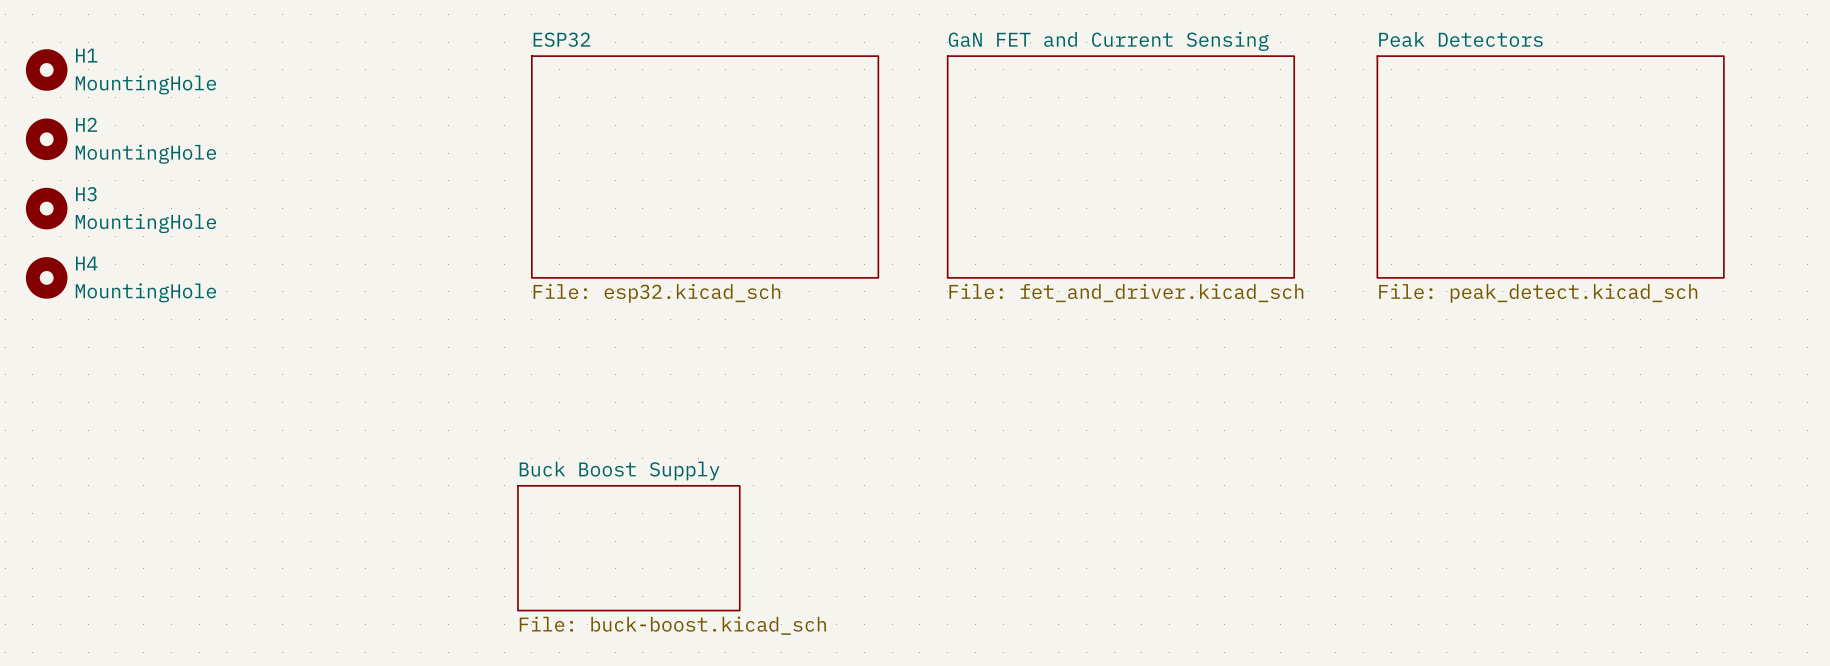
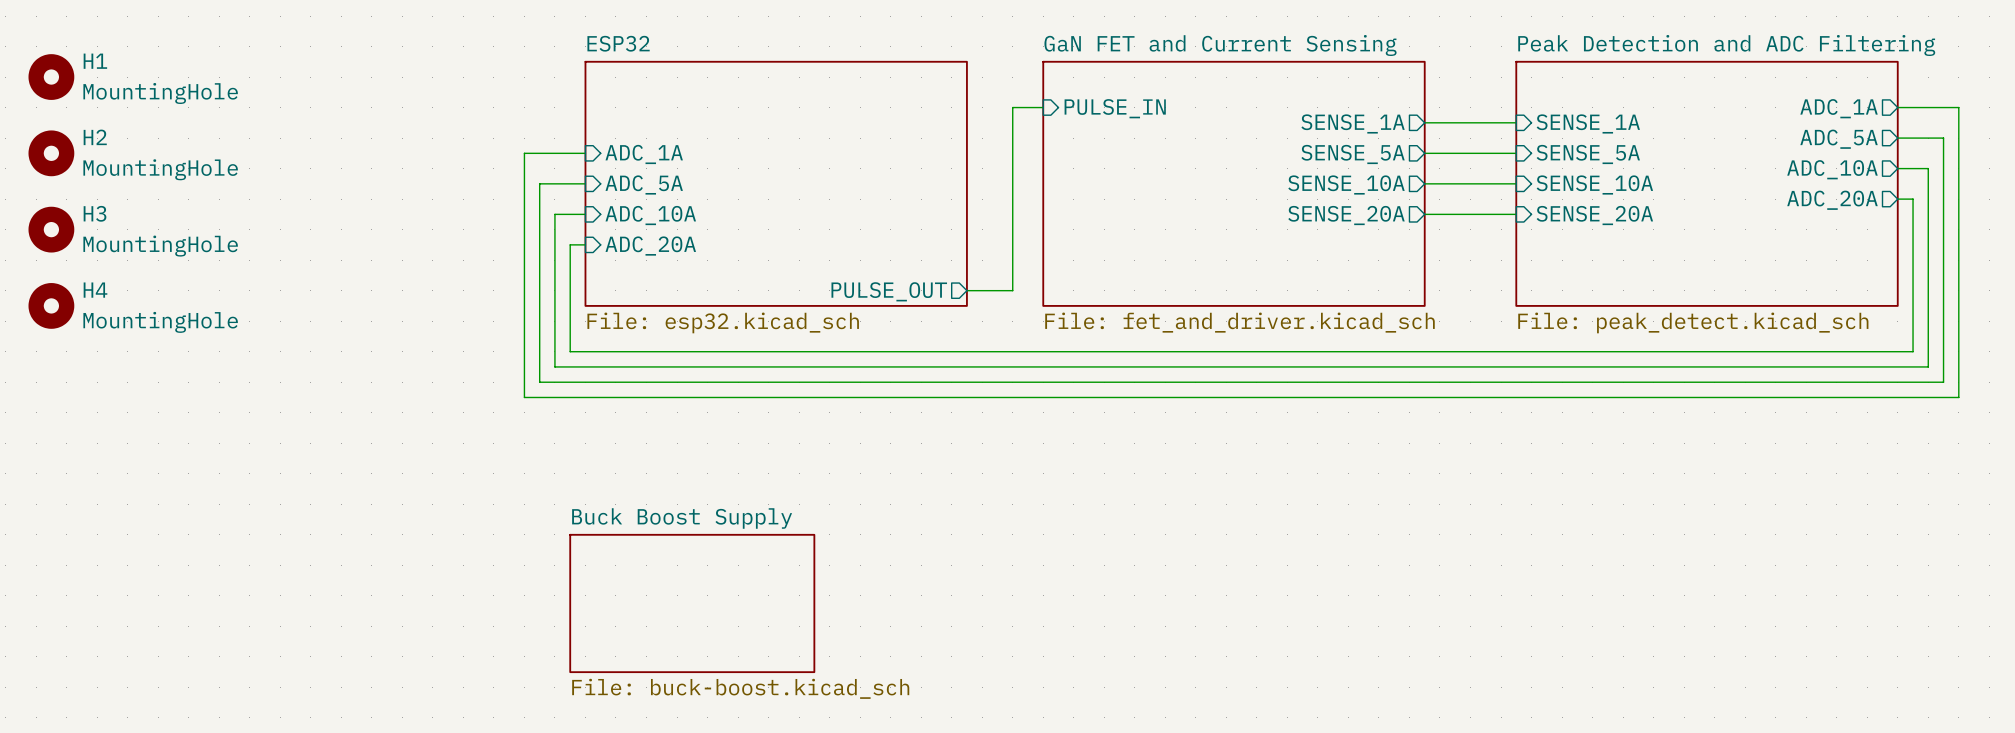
sheet Peak Detectors name: Peak Detectors (1460, 39) -> Peak Detection and ADC Filtering (1726, 45)
wire: none -> (1043, 107) (1012, 107) (1012, 290) (966, 290)
wire: none -> (1897, 107) (1958, 107) (1958, 397) (524, 397) (524, 153) (585, 153)
sheet pin: none -> PULSE_IN (1115, 108)
sheet pin: none -> ADC_1A (1839, 108)
wire: none -> (1424, 122) (1516, 122)
sheet pin: none -> SENSE_1A (1353, 123)
sheet pin: none -> SENSE_1A (1588, 123)
wire: none -> (1897, 138) (1943, 138) (1943, 382) (539, 382) (539, 183) (585, 183)
sheet pin: none -> ADC_5A (1839, 139)
wire: none -> (1424, 153) (1516, 153)
sheet pin: none -> ADC_1A (644, 154)
sheet pin: none -> SENSE_5A (1353, 154)
sheet pin: none -> SENSE_5A (1588, 154)
wire: none -> (1897, 168) (1928, 168) (1928, 366) (554, 366) (554, 214) (585, 214)
sheet pin: none -> ADC_10A (1832, 169)
wire: none -> (1424, 183) (1516, 183)
sheet pin: none -> ADC_5A (644, 185)
sheet pin: none -> SENSE_10A (1346, 185)
sheet pin: none -> SENSE_10A (1594, 185)
wire: none -> (1897, 199) (1913, 199) (1913, 351) (570, 351) (570, 244) (585, 244)
sheet pin: none -> ADC_20A (1832, 200)
wire: none -> (1424, 214) (1516, 214)
sheet pin: none -> ADC_10A (650, 215)
sheet pin: none -> SENSE_20A (1346, 215)
sheet pin: none -> SENSE_20A (1594, 215)
sheet pin: none -> ADC_20A (650, 246)
sheet pin: none -> PULSE_OUT (889, 291)

